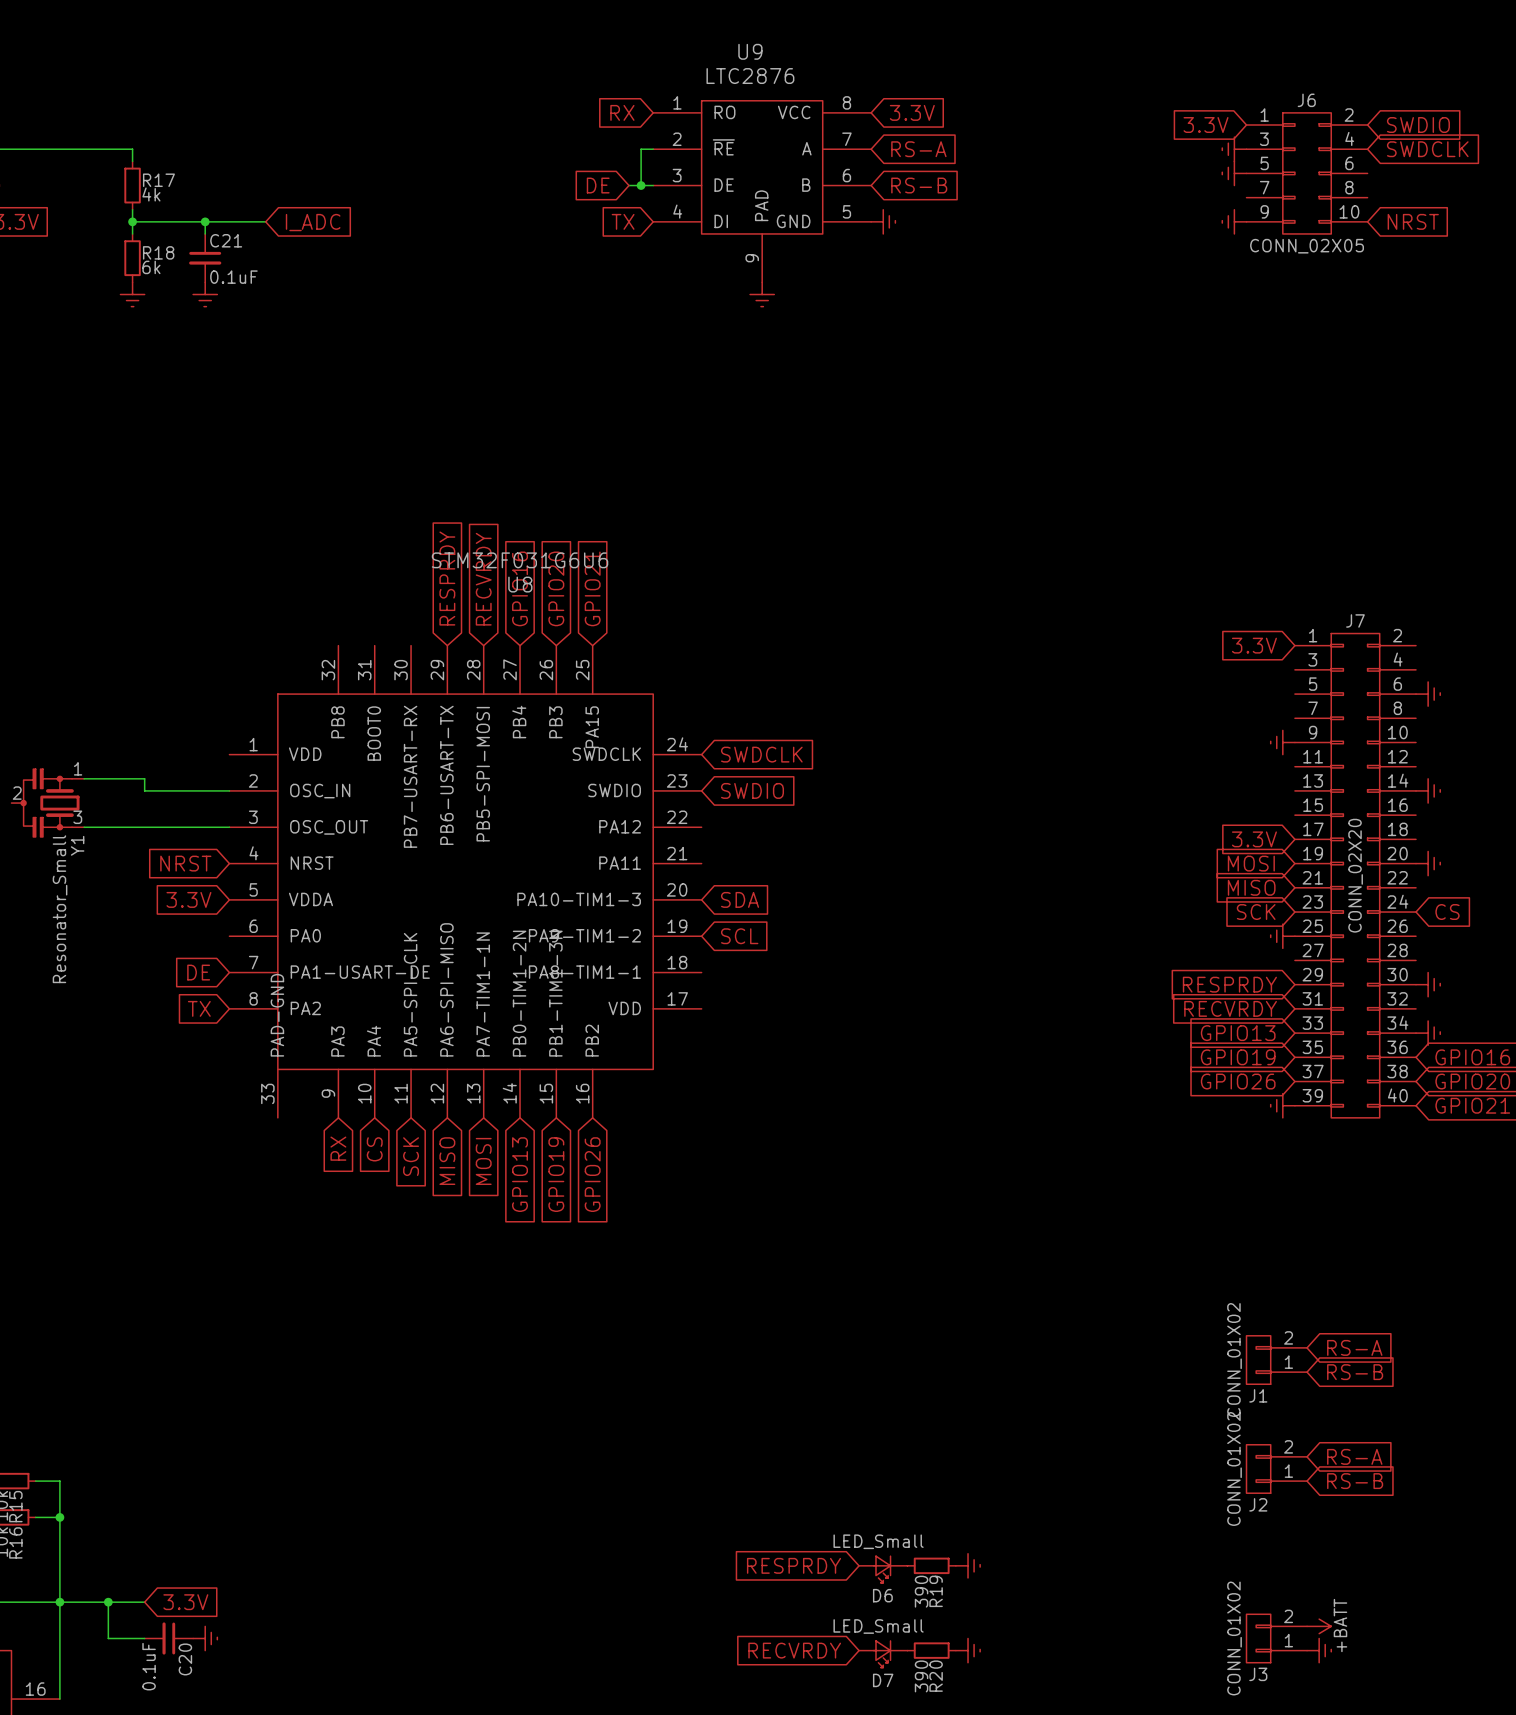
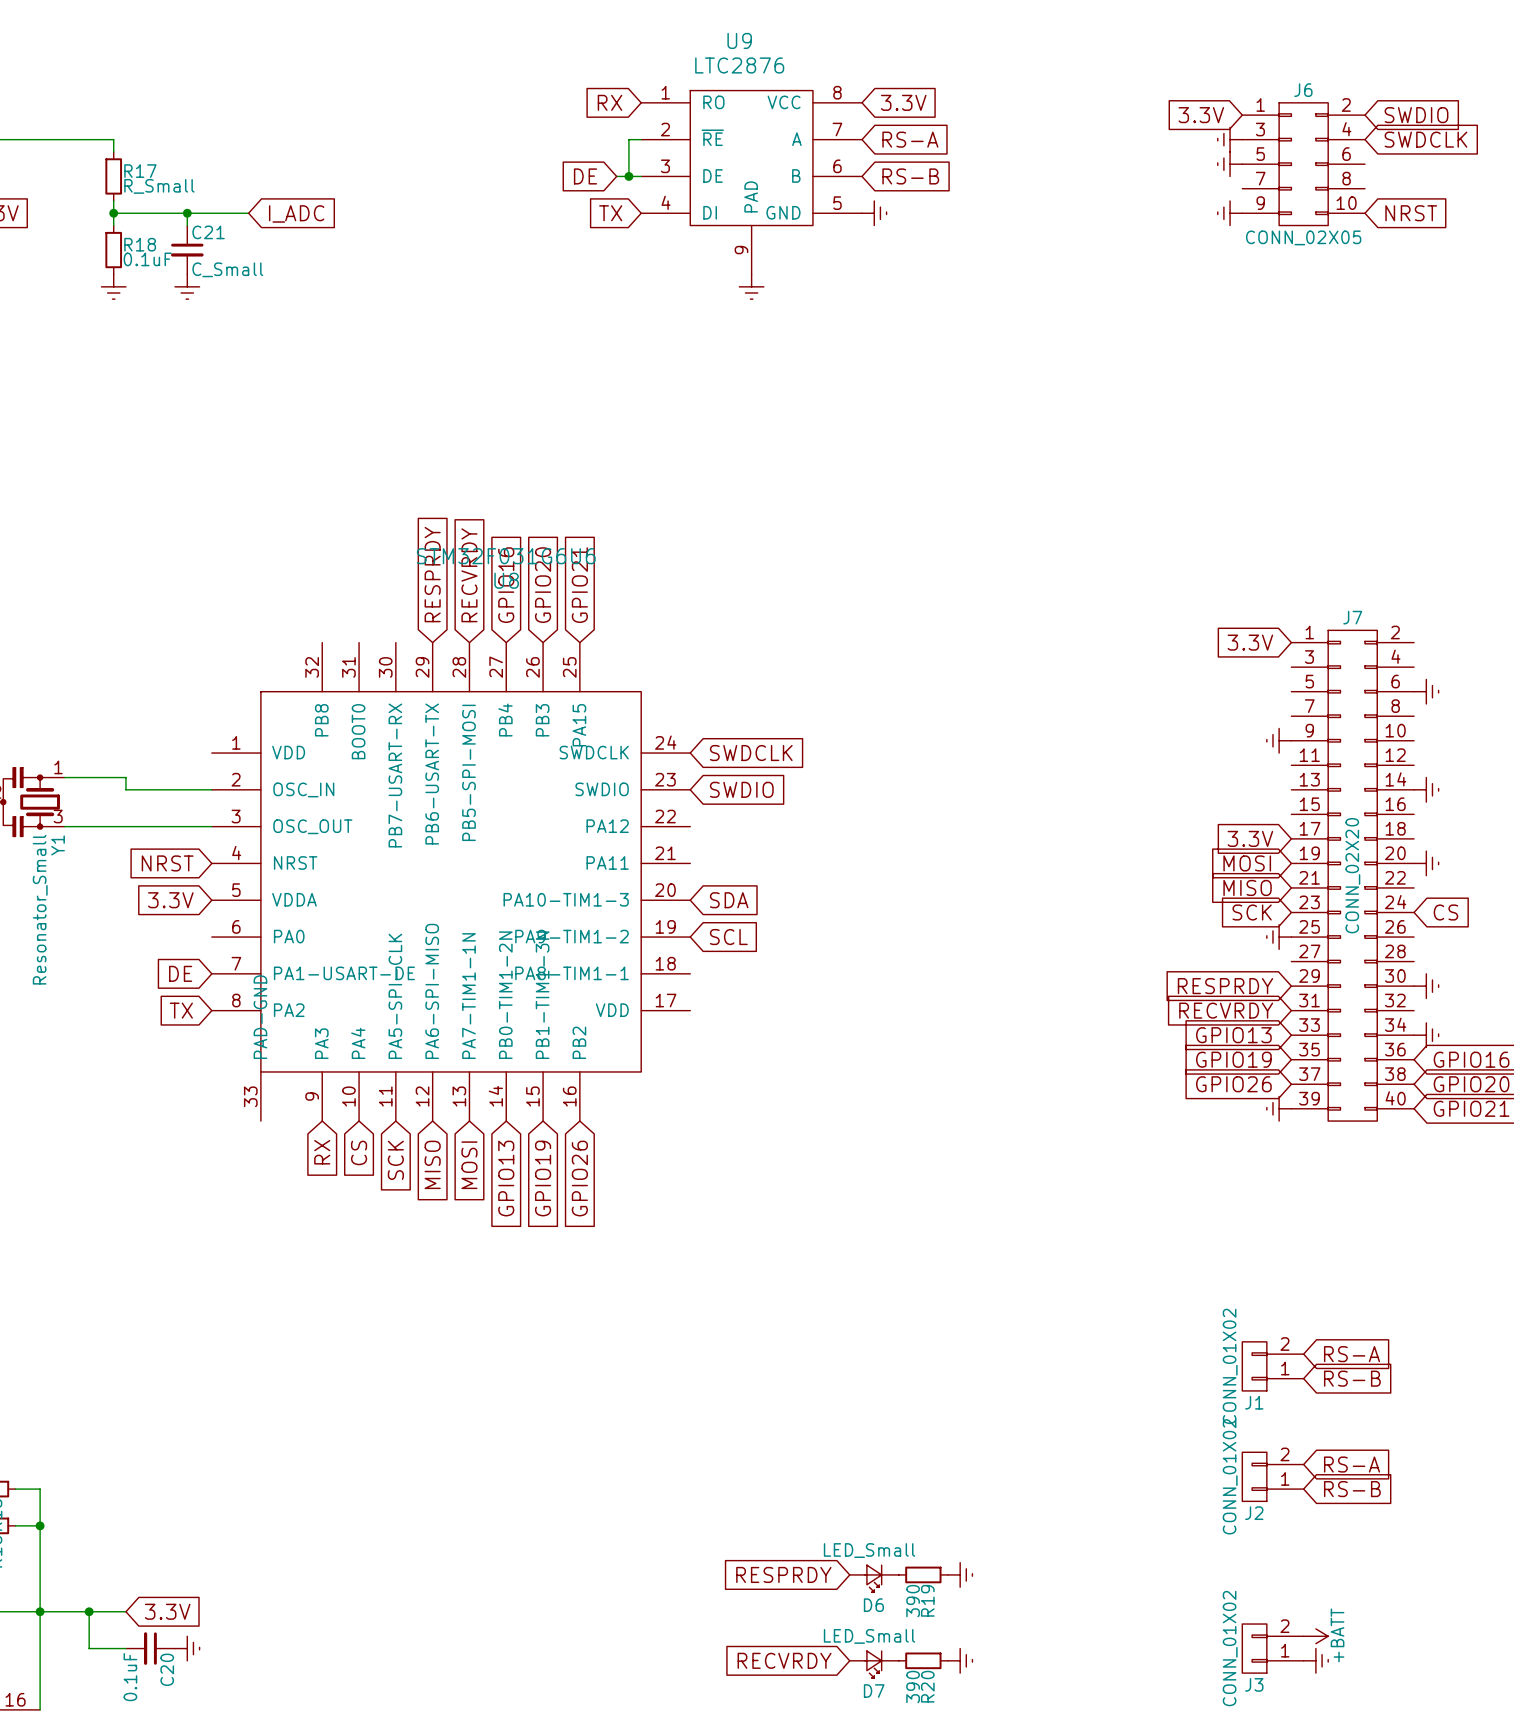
R17 value: 4k (151, 194) -> R_Small (159, 186)
R18 value: 6k (151, 267) -> 0.1uF (147, 259)
C21 value: 0.1uF (233, 277) -> C_Small (227, 269)

